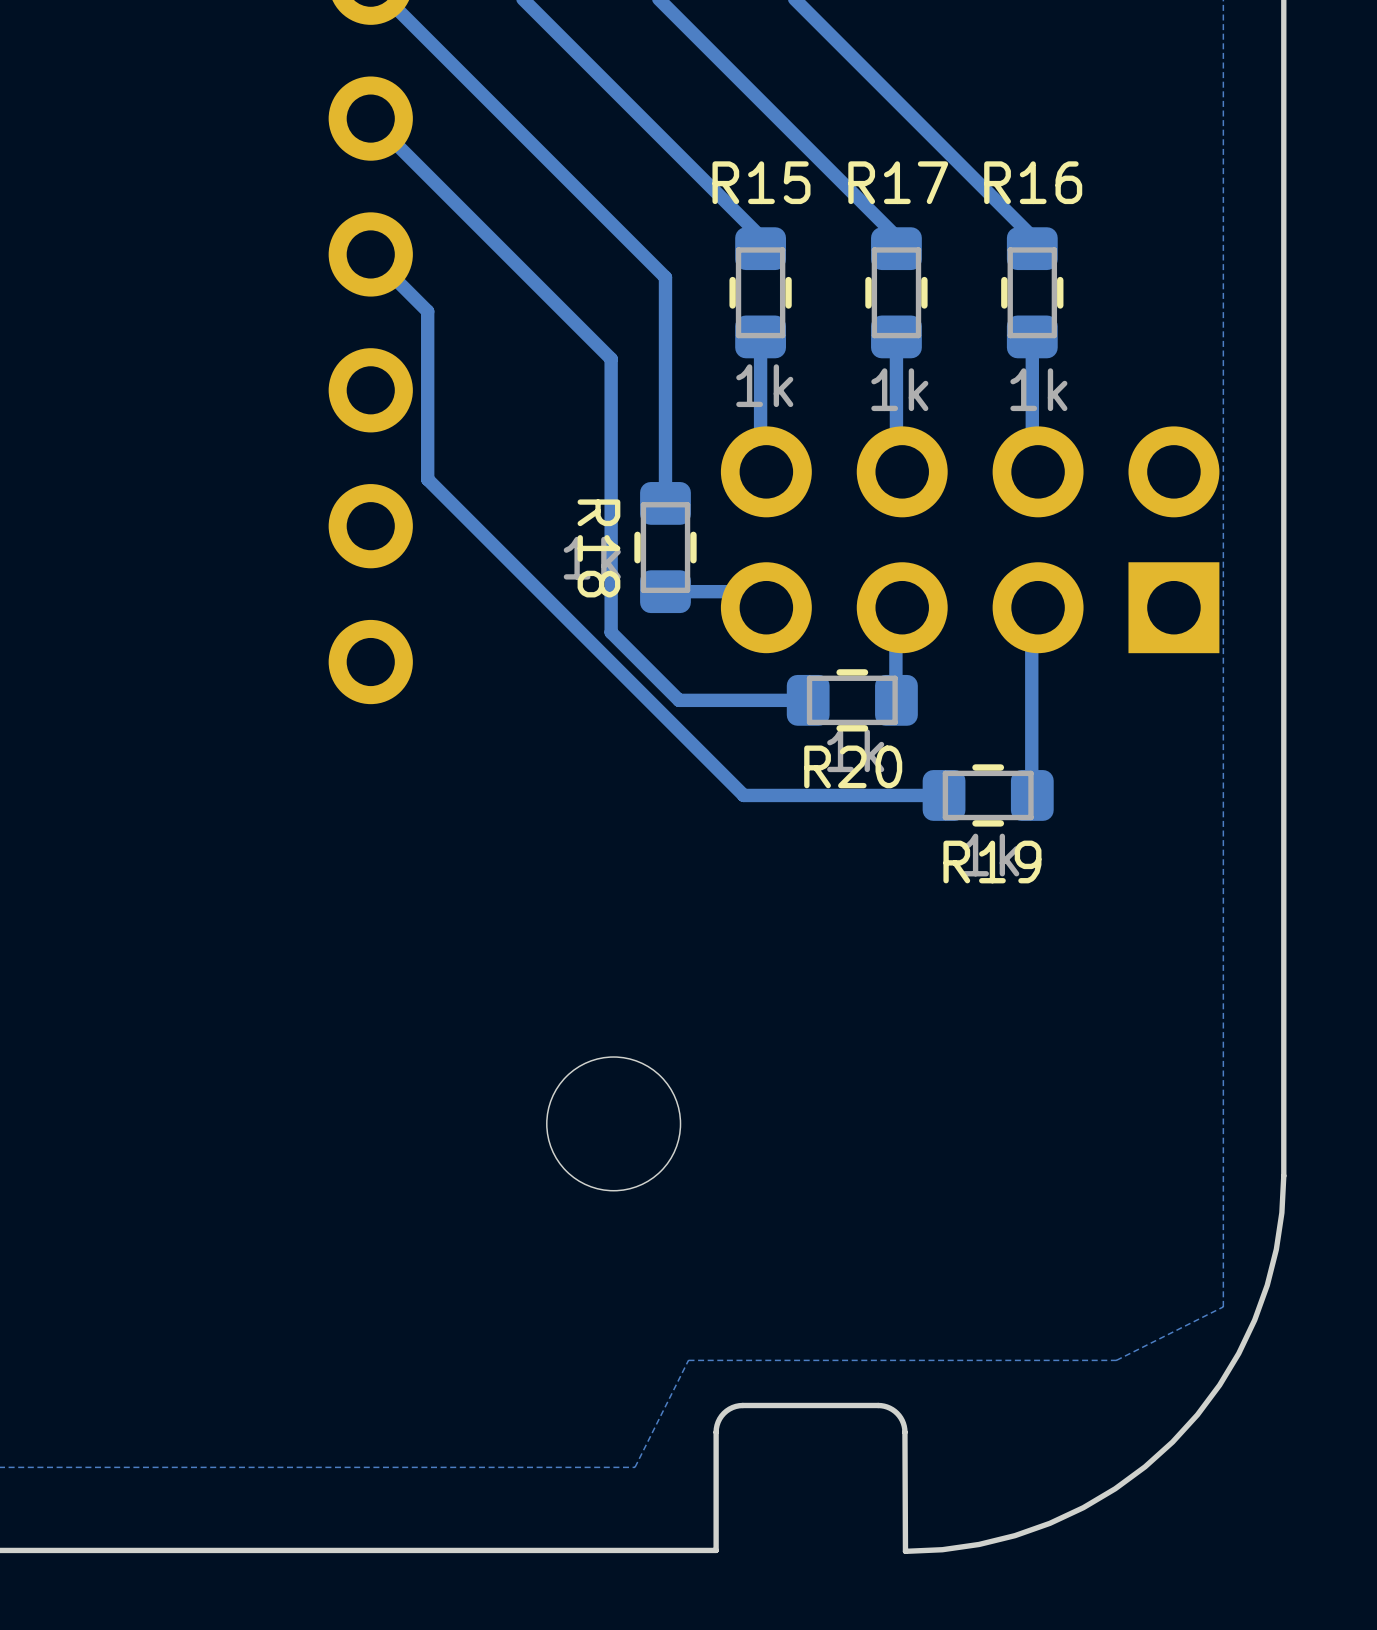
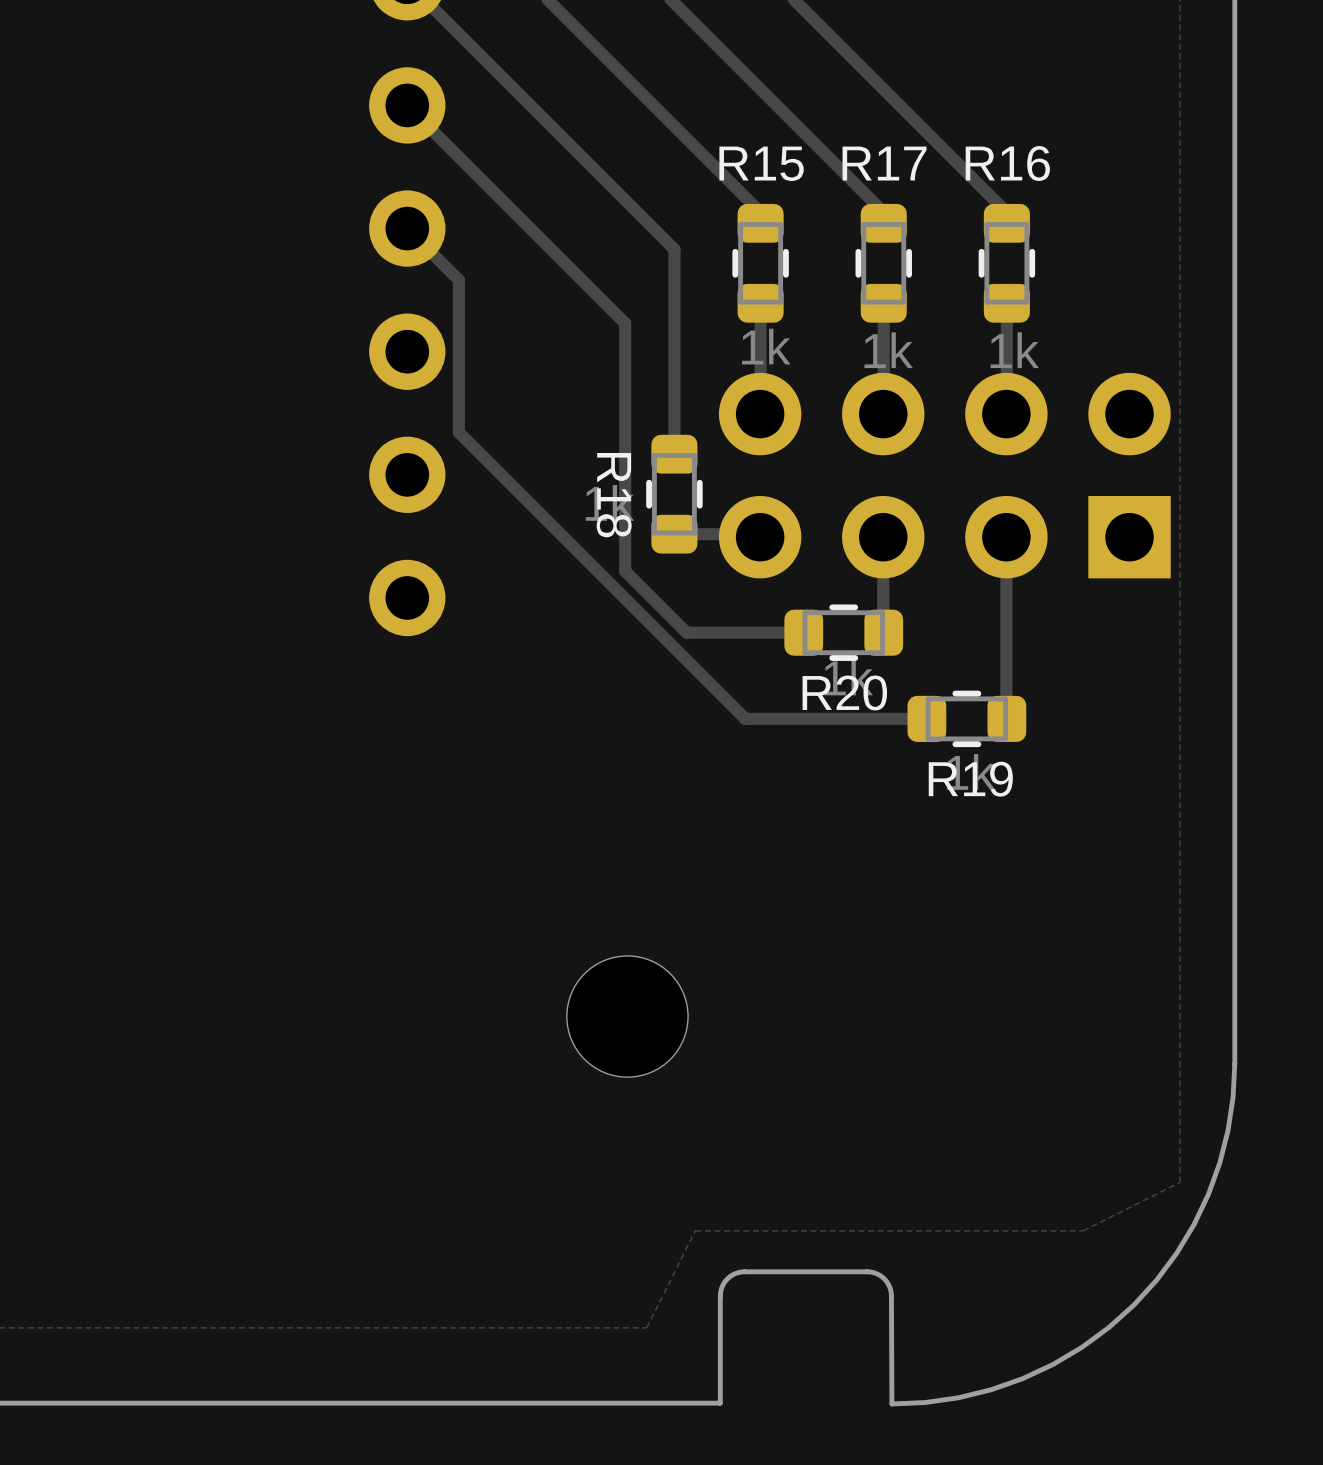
part position: (970, 539) -> (944, 475)

